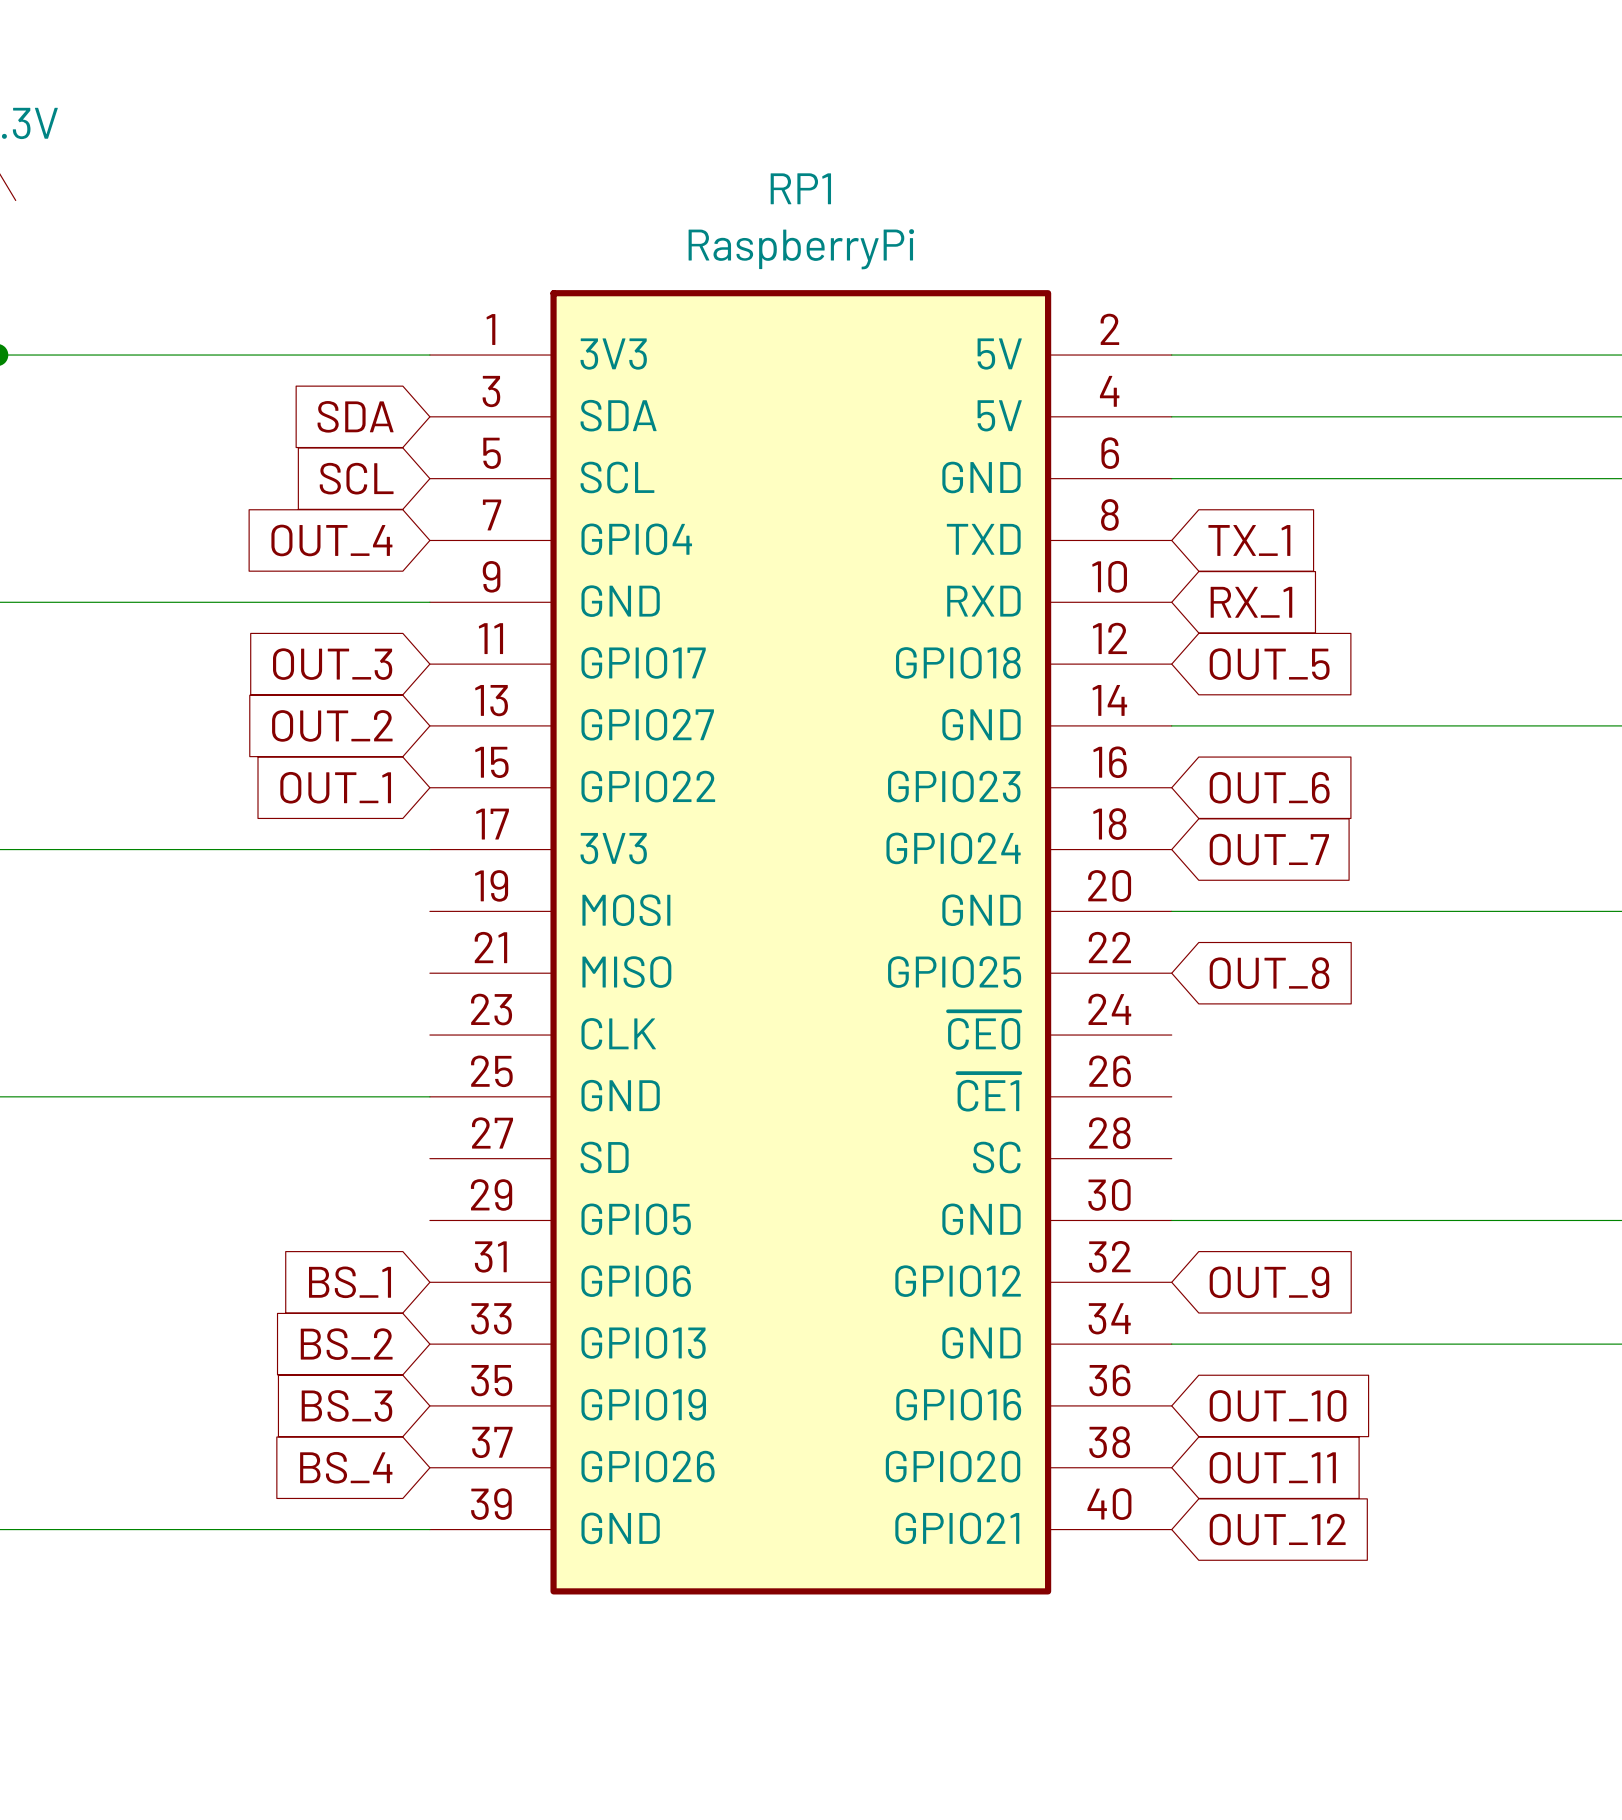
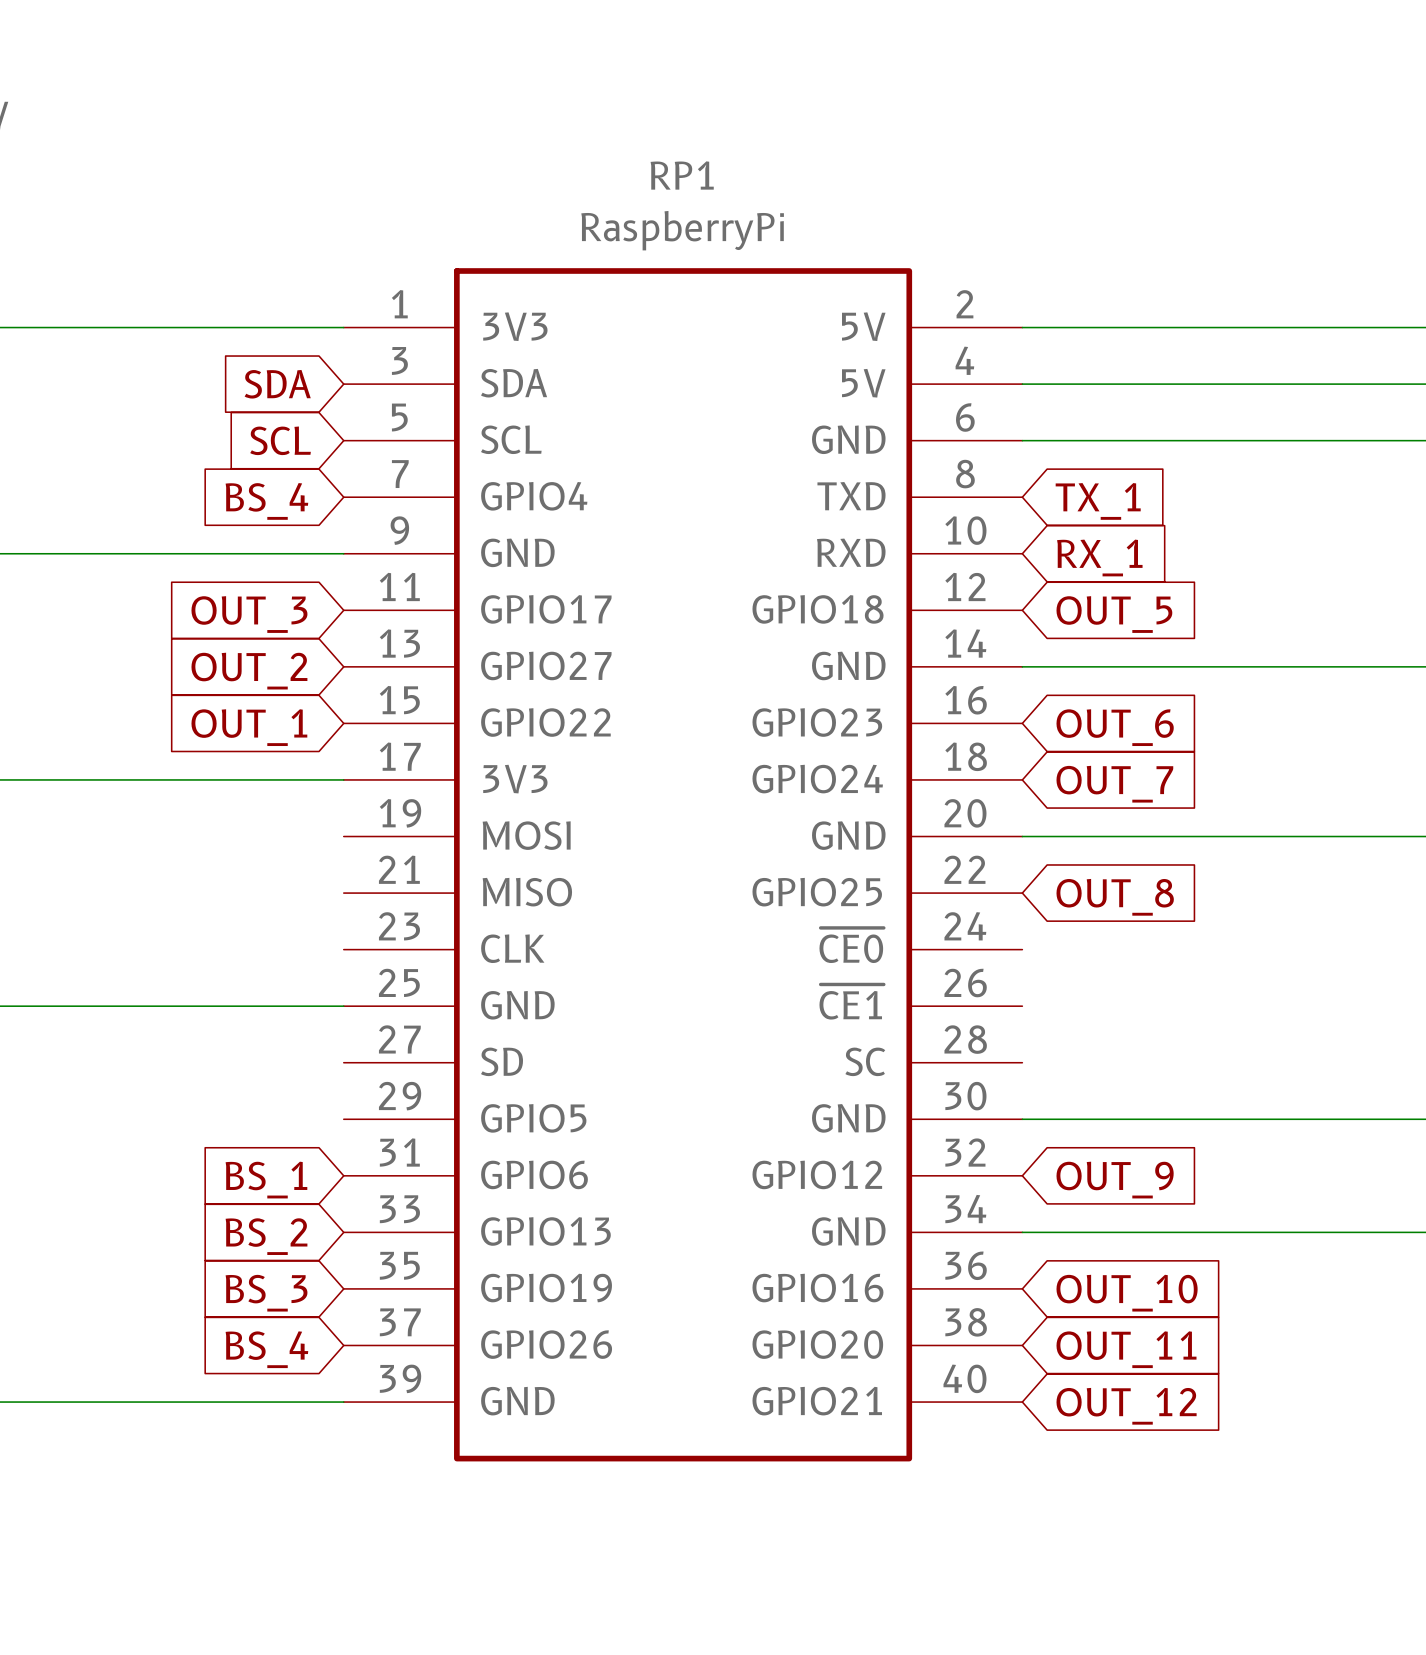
global label: OUT_4 (331, 540) -> BS_4 (266, 501)

